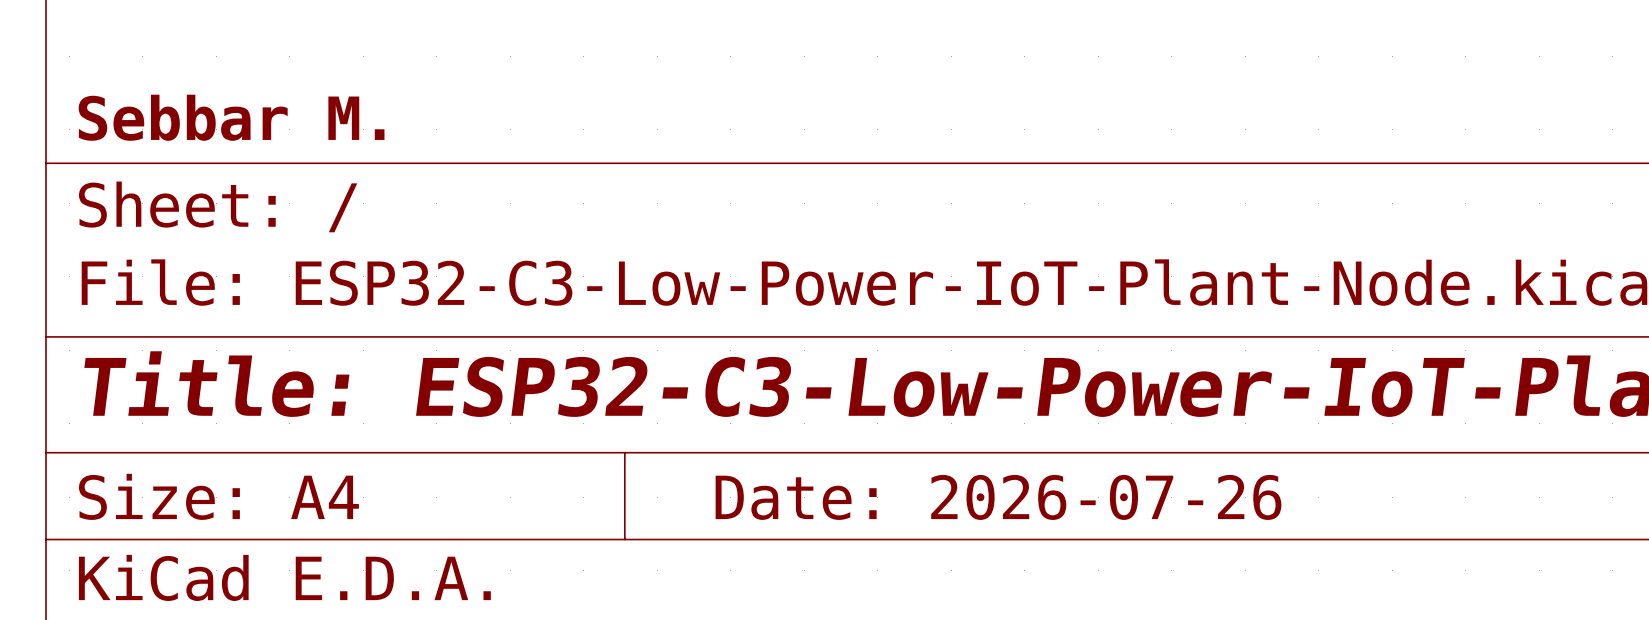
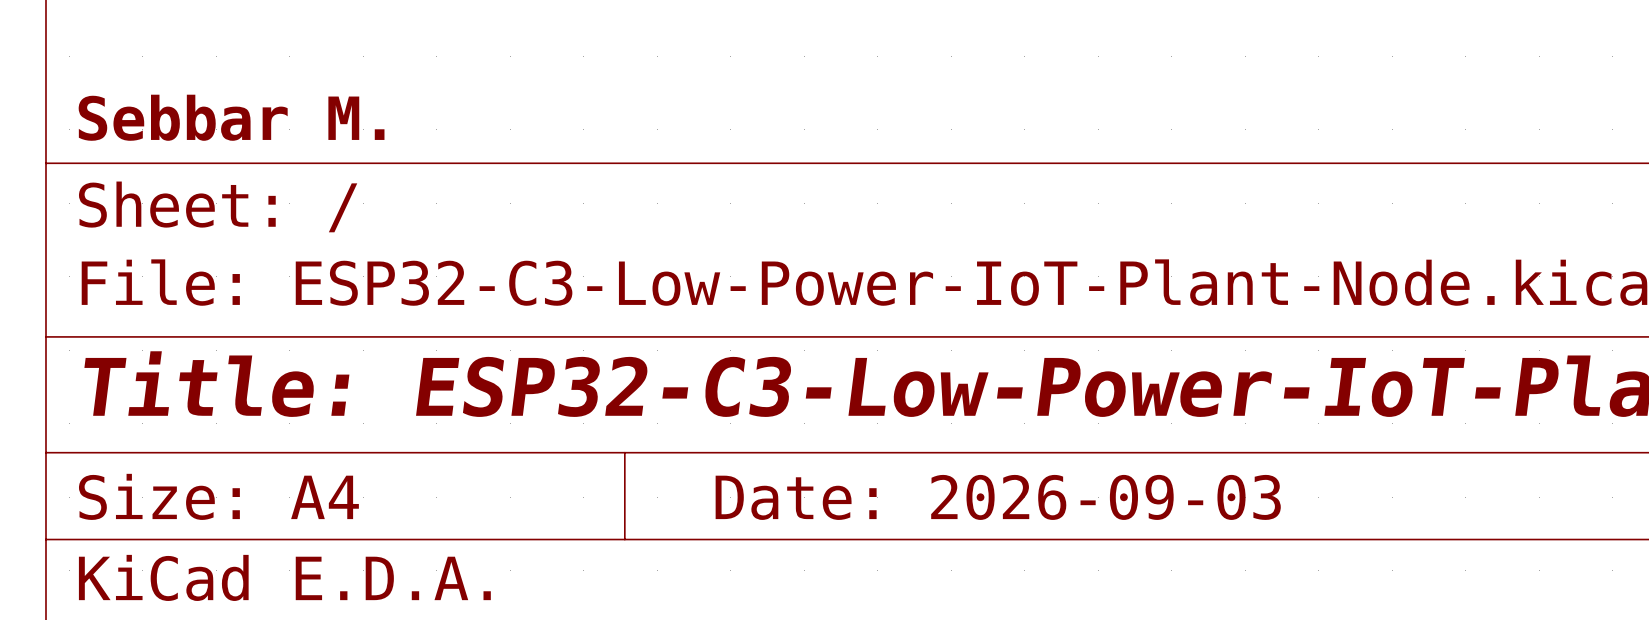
title block: Date: 2026-07-26 (998, 497) -> Date: 2026-09-03 (998, 497)

